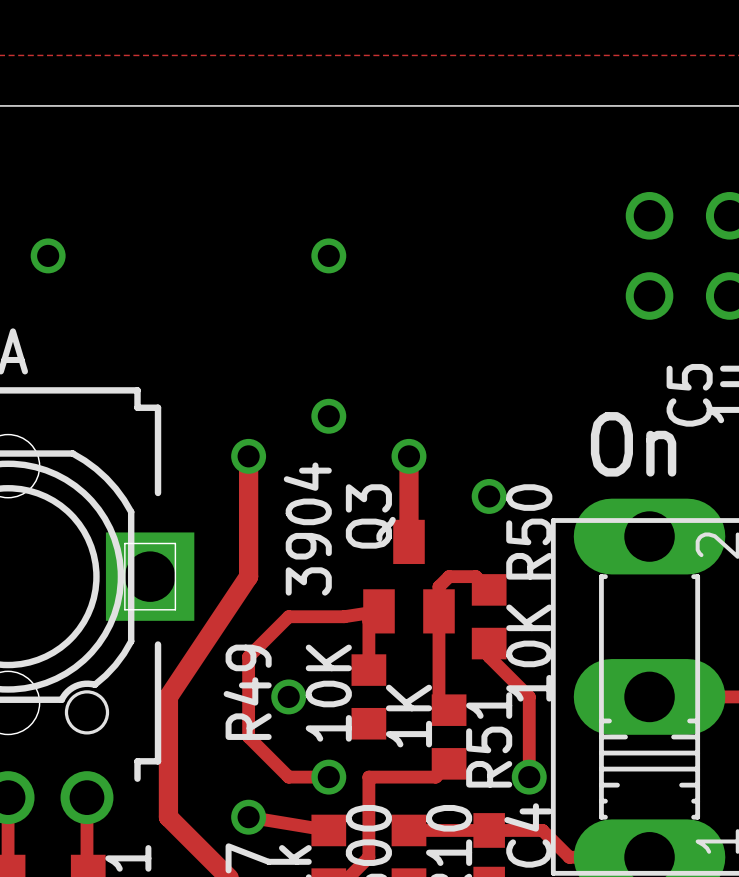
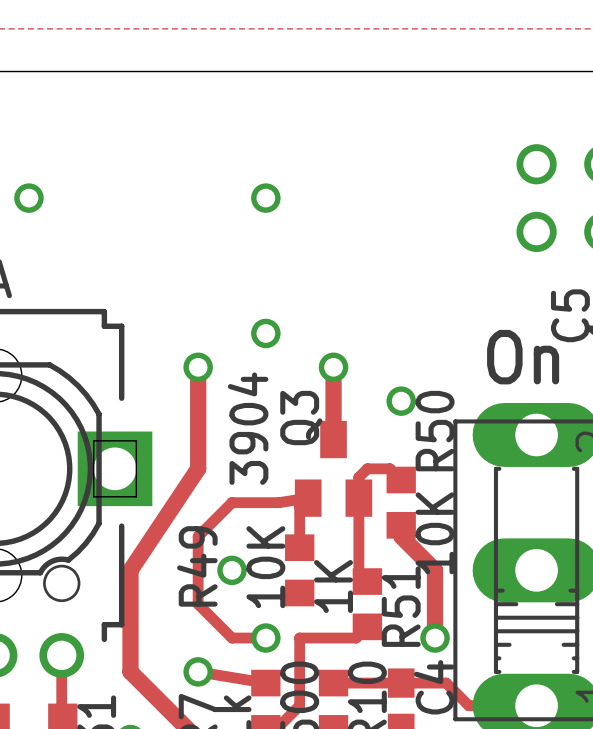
track width: thin (489, 656) (529, 696) (529, 777) -> thick (401, 536) (435, 570) (435, 638)

